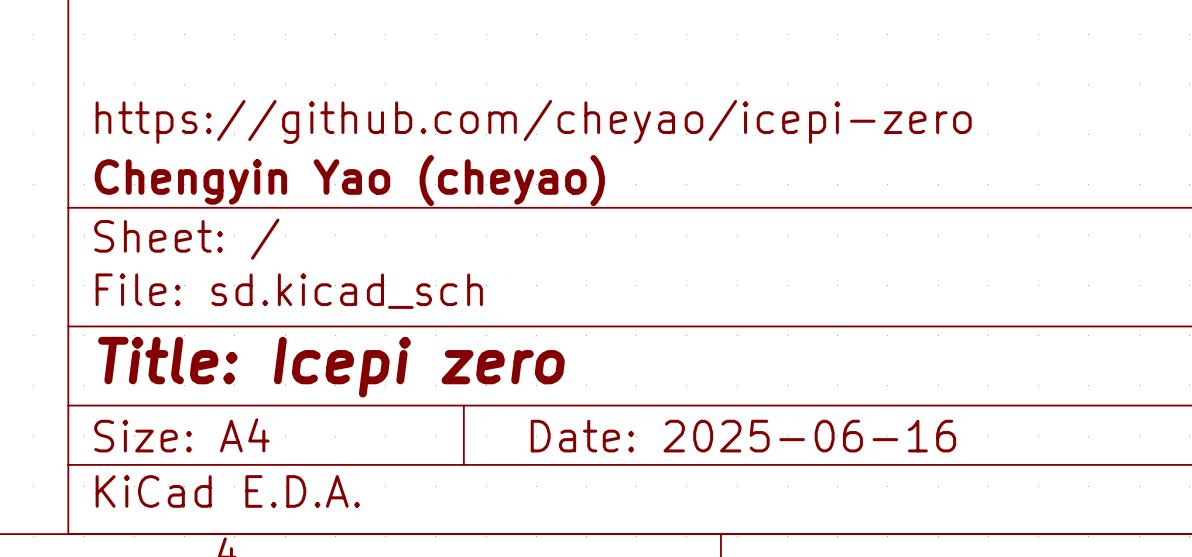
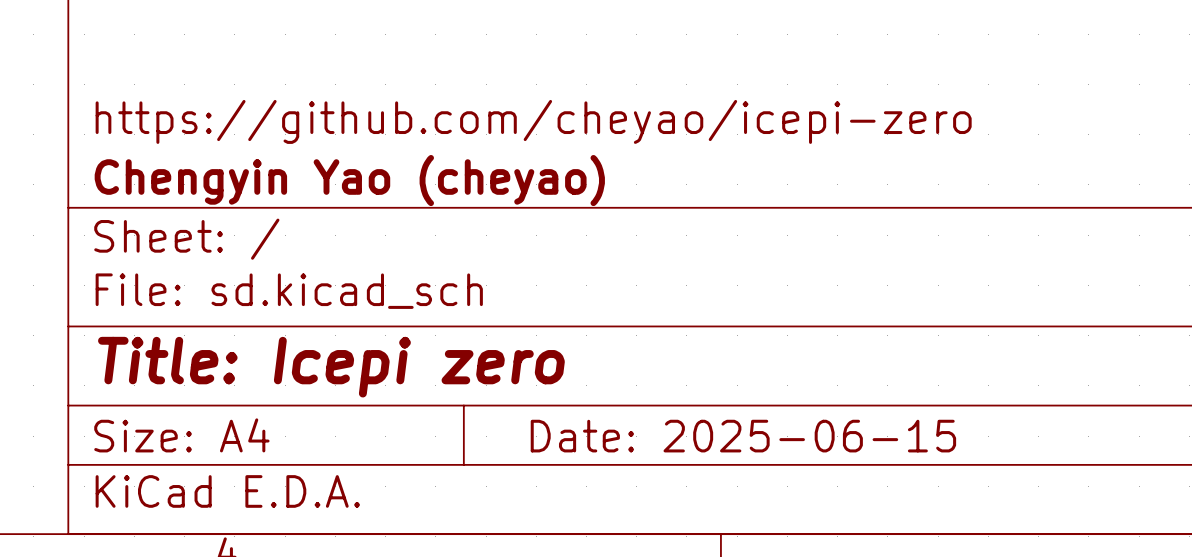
title block: Date: 2025-06-16 (743, 436) -> Date: 2025-06-15 (743, 436)

